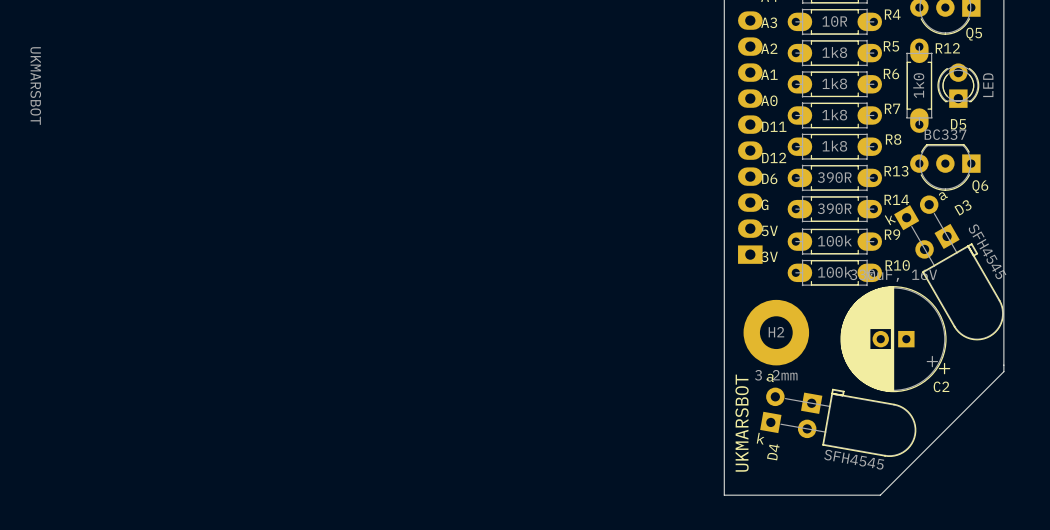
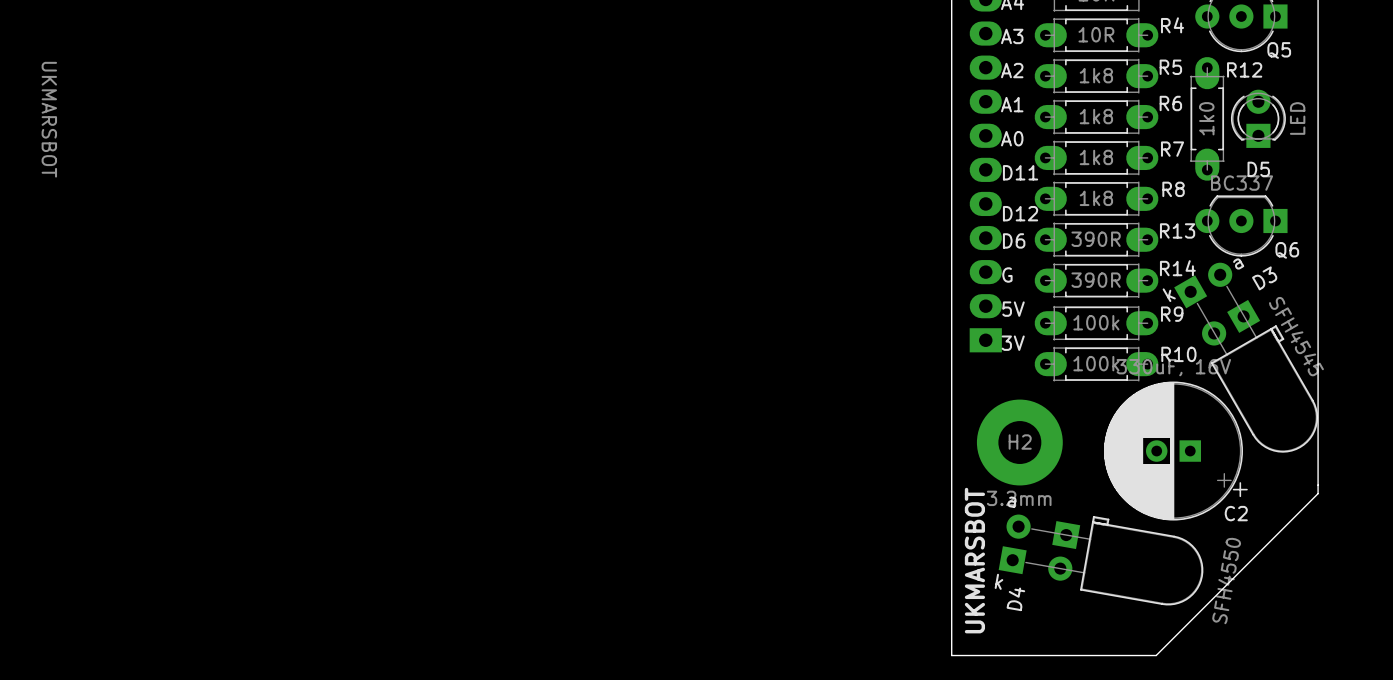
D4 value: SFH4545 (854, 459) -> SFH4550 (1226, 581)

